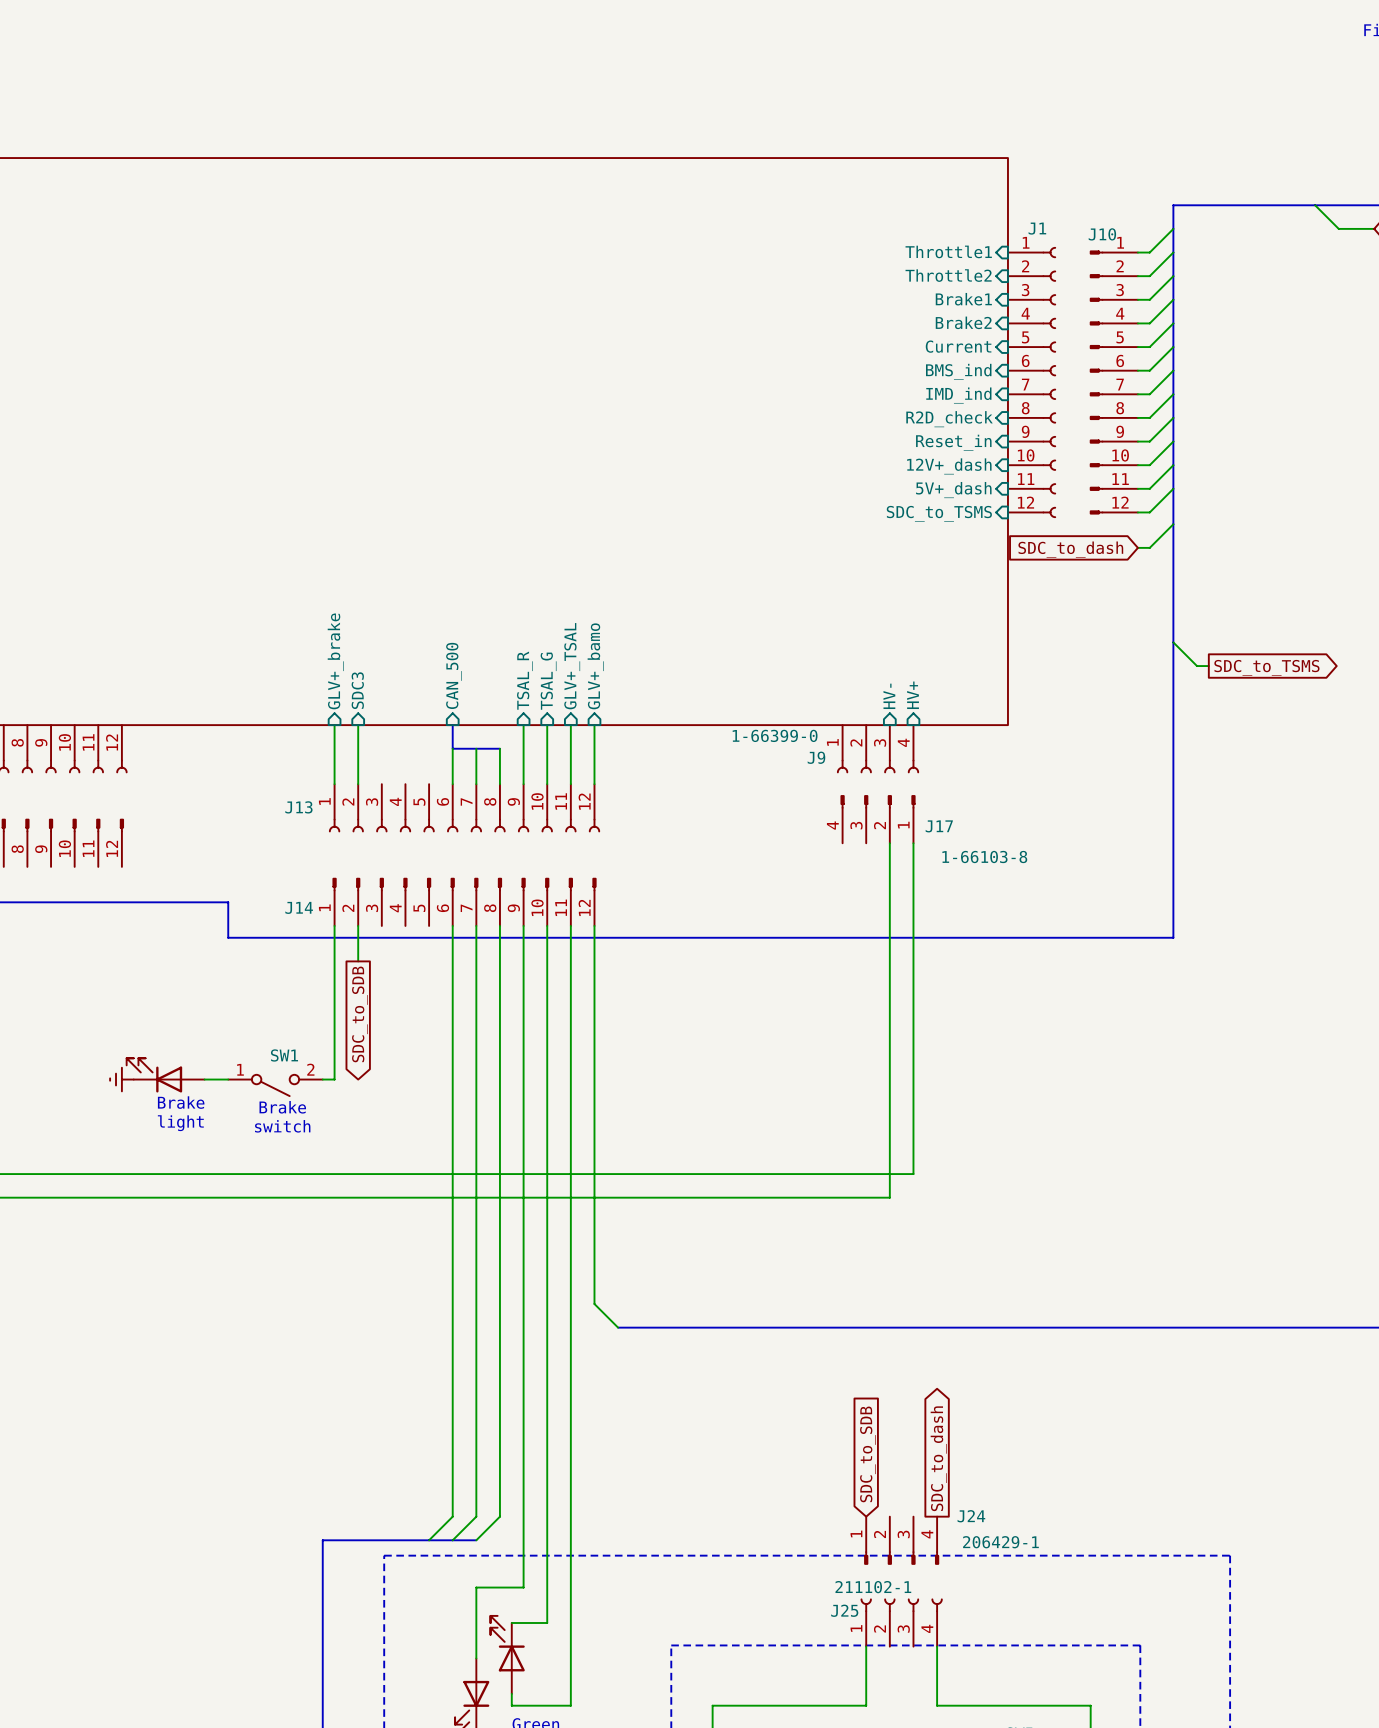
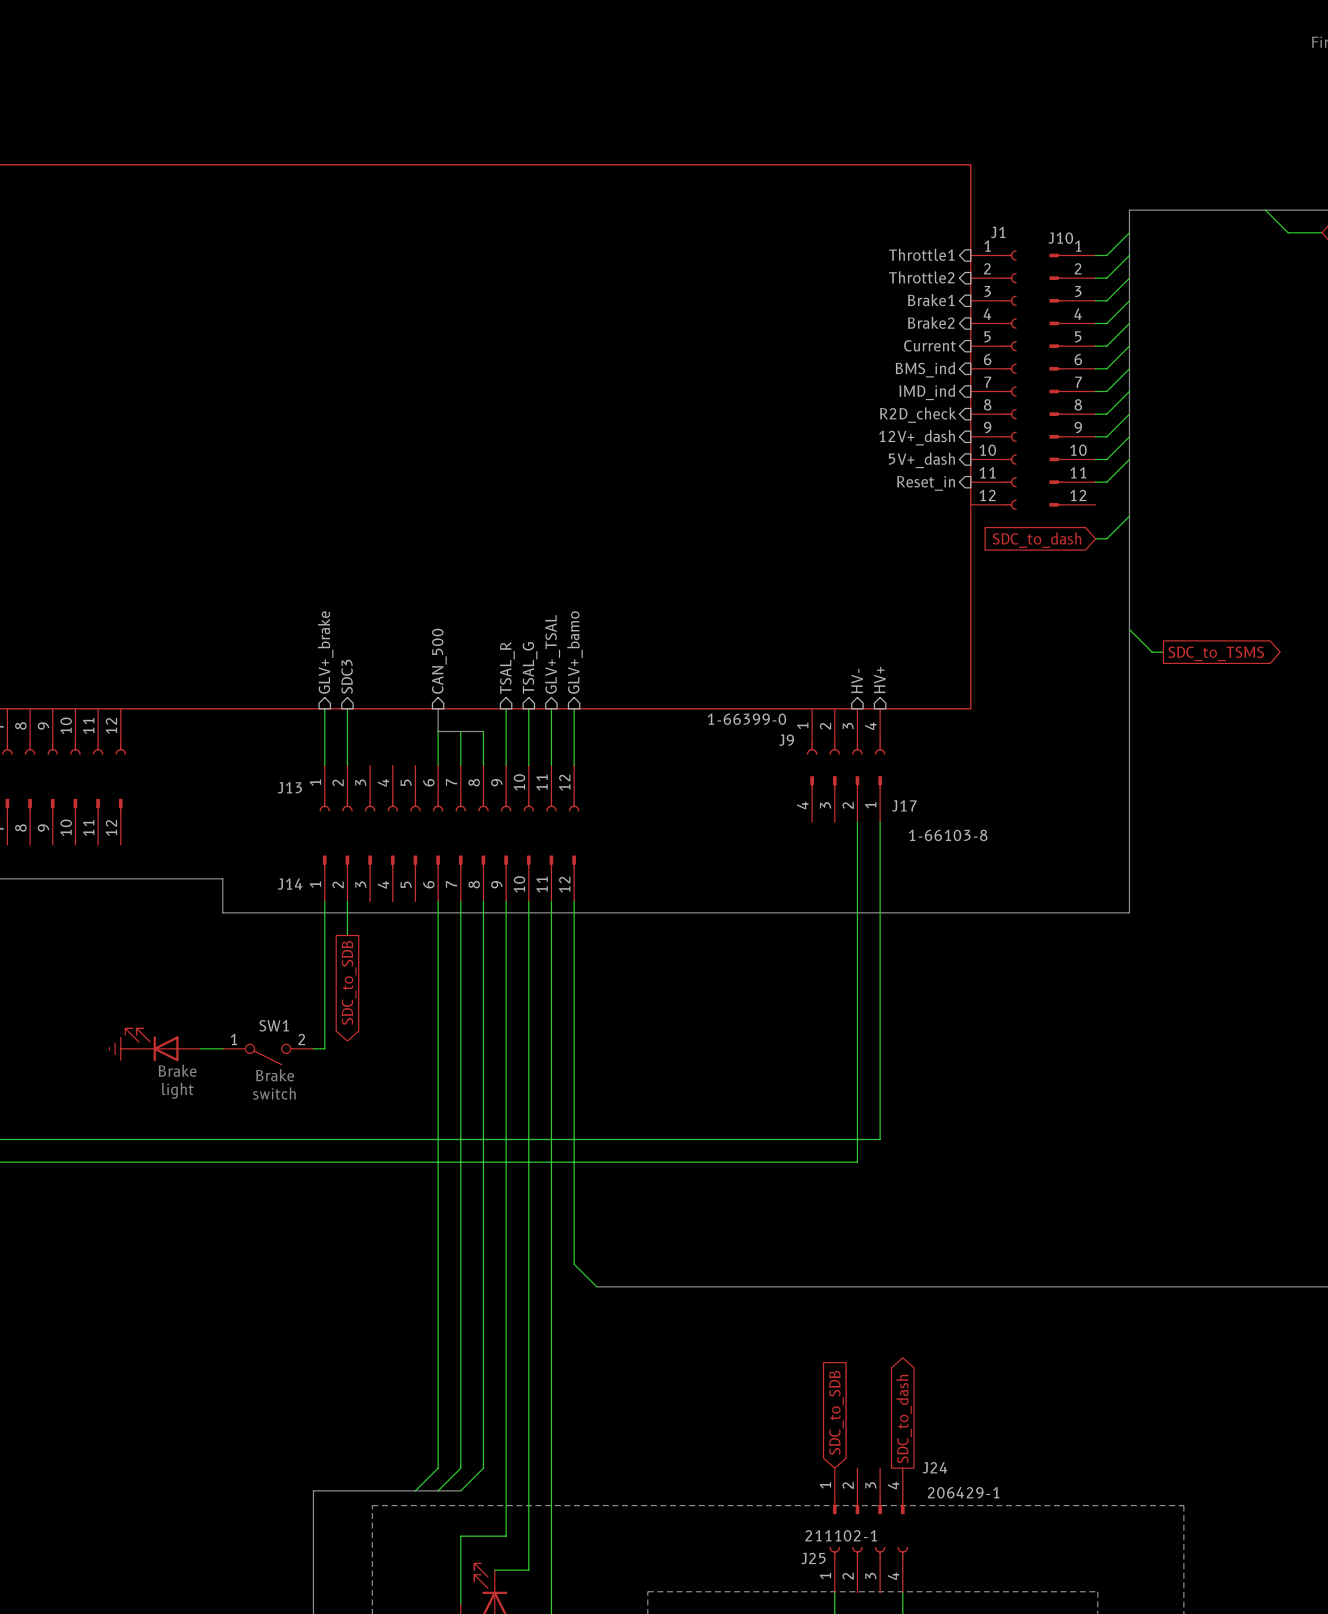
sheet pin: Reset_in (953, 442) -> 12V+_dash (917, 437)
sheet pin: 12V+_dash (949, 466) -> 5V+_dash (921, 460)
wire: (1173, 488) (1149, 512) (1137, 512) -> none
sheet pin: 5V+_dash (953, 490) -> Reset_in (926, 483)
sheet pin: SDC_to_TSMS (939, 513) -> none

